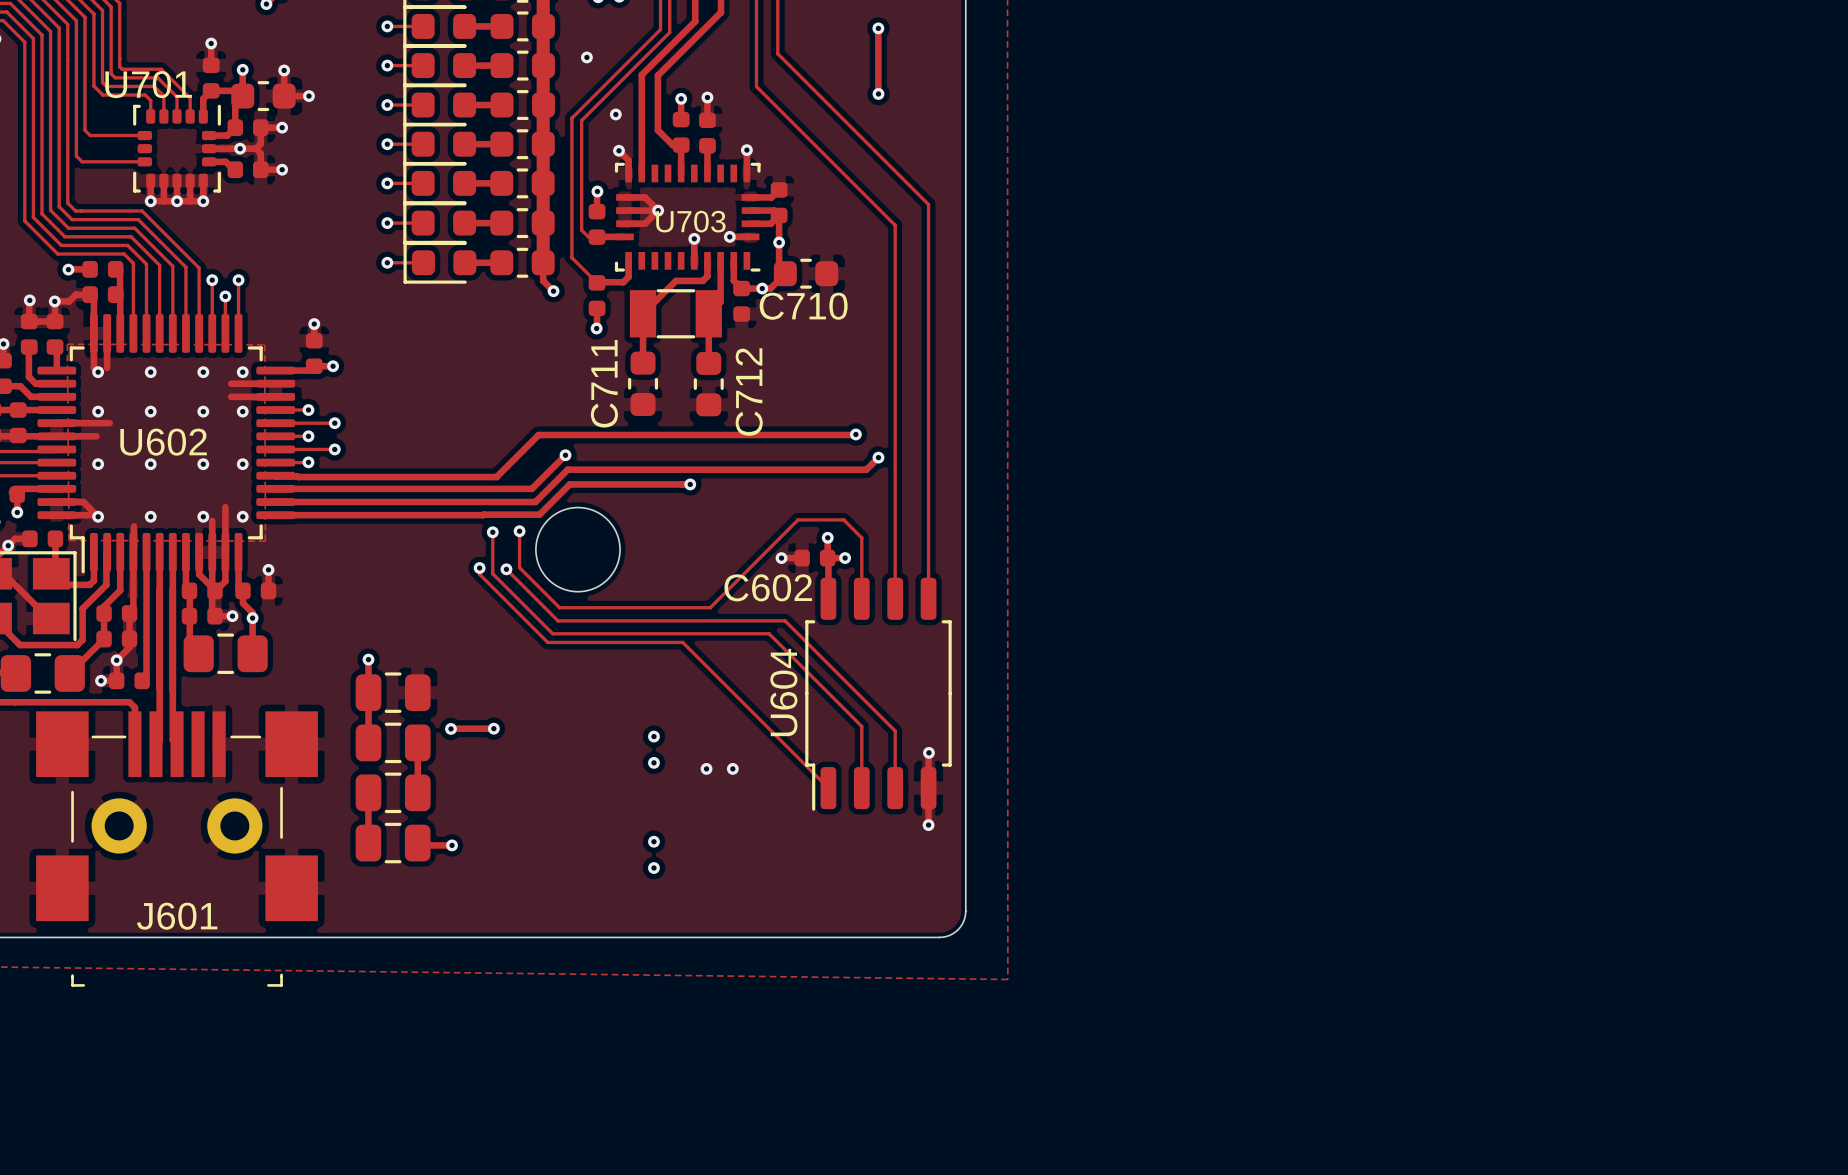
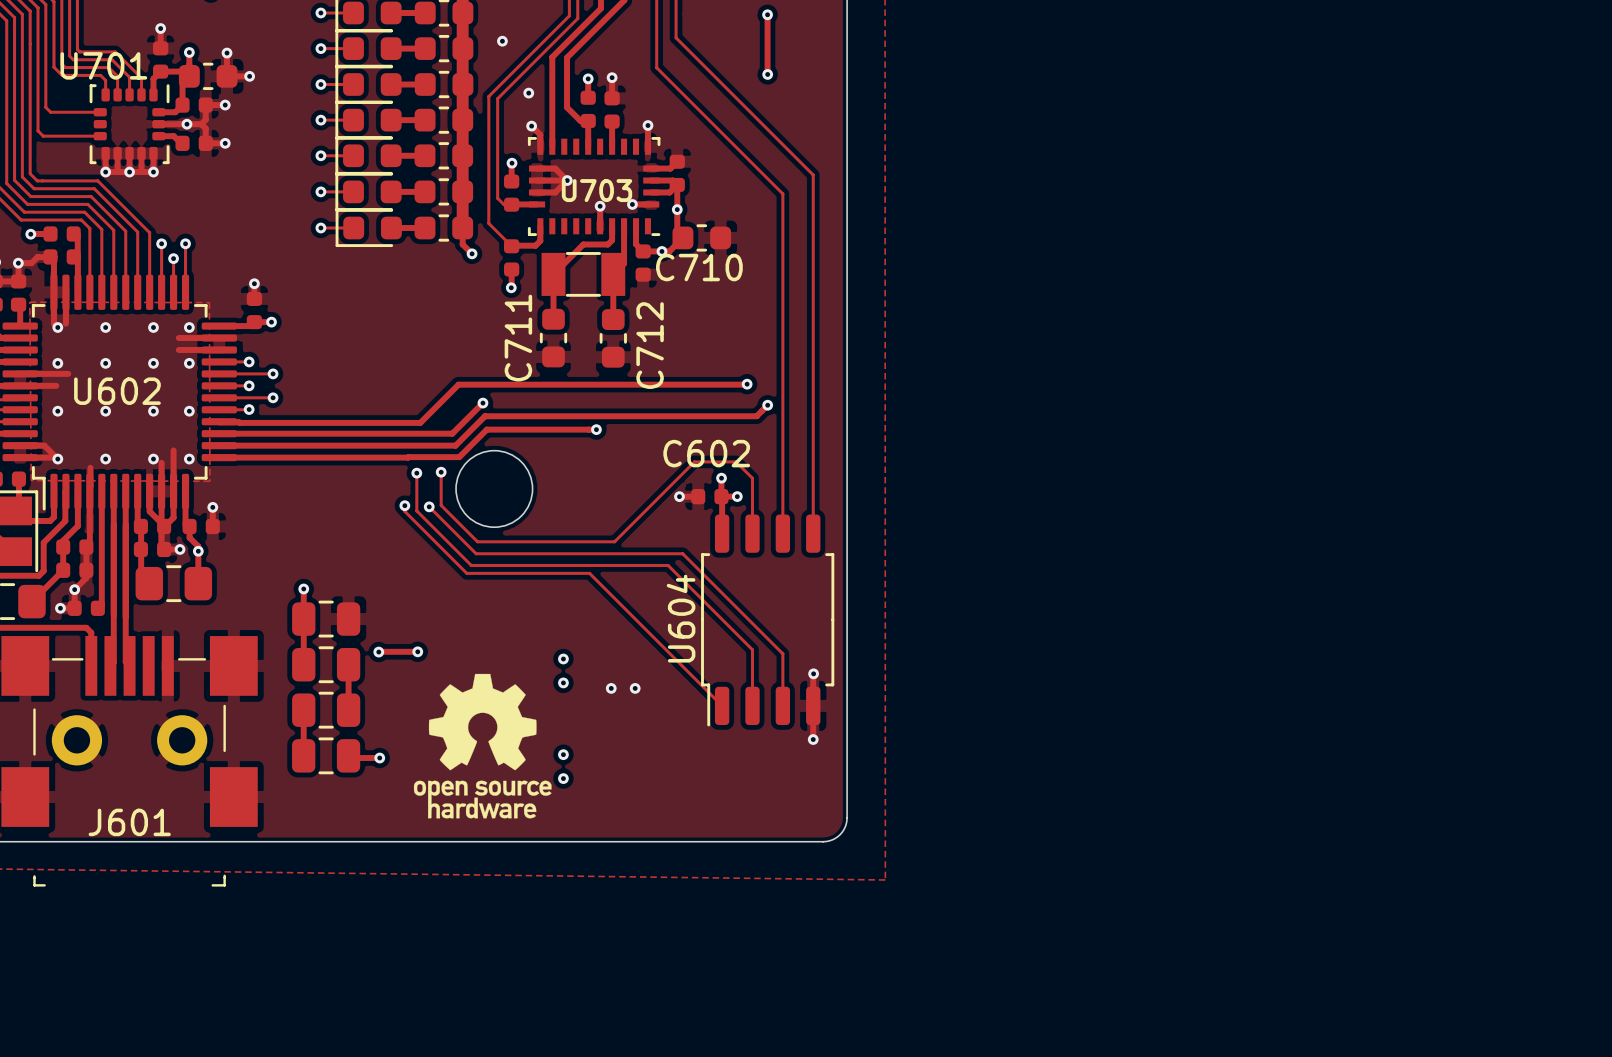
C602 name position: C602 (768, 587) -> C602 (706, 453)
drawing: none -> [413, 673, 552, 819]

